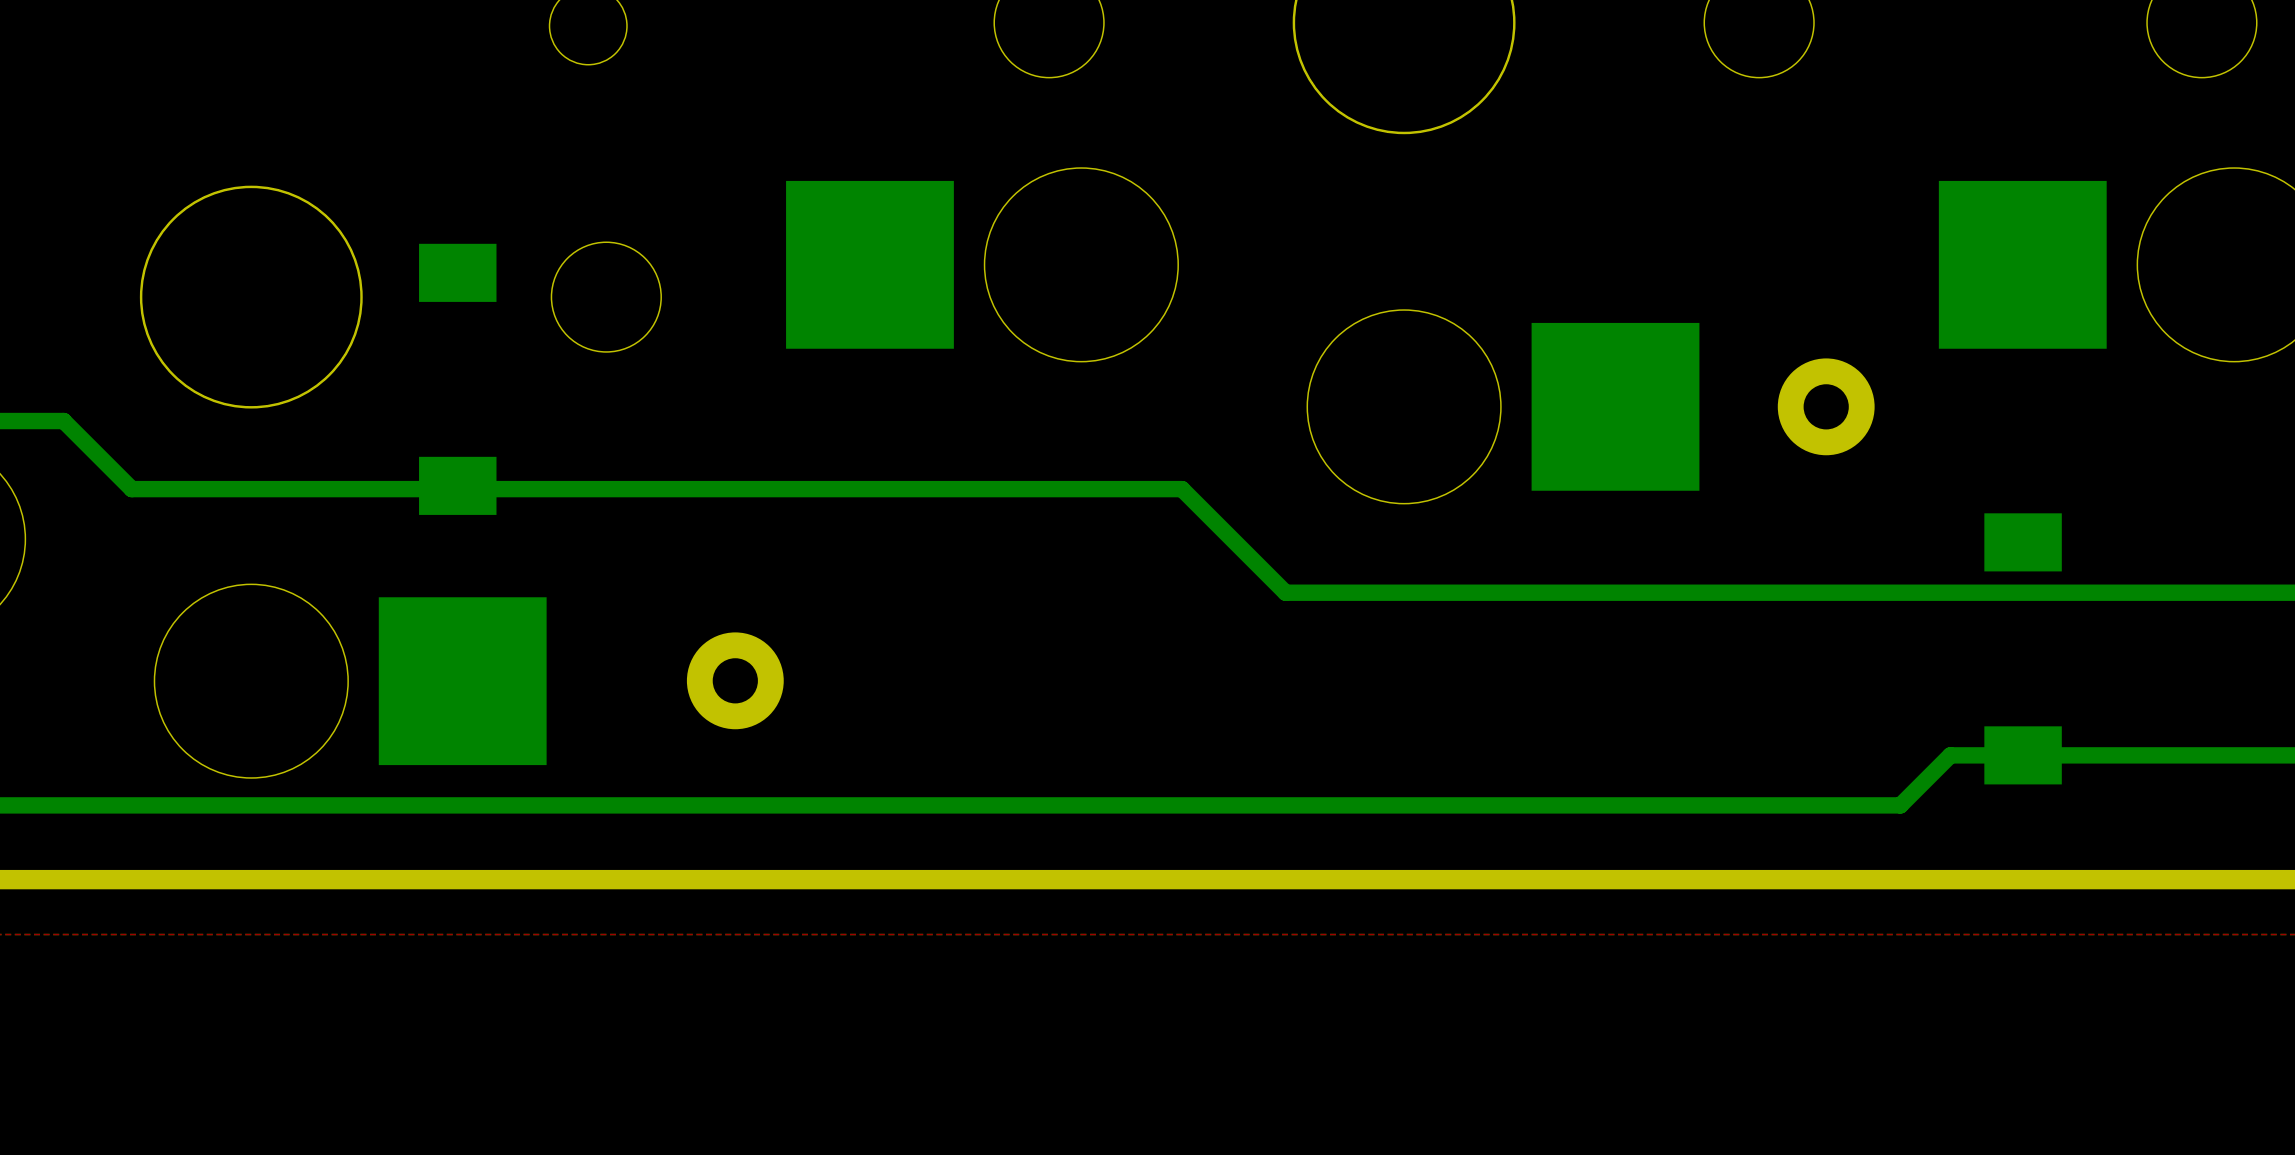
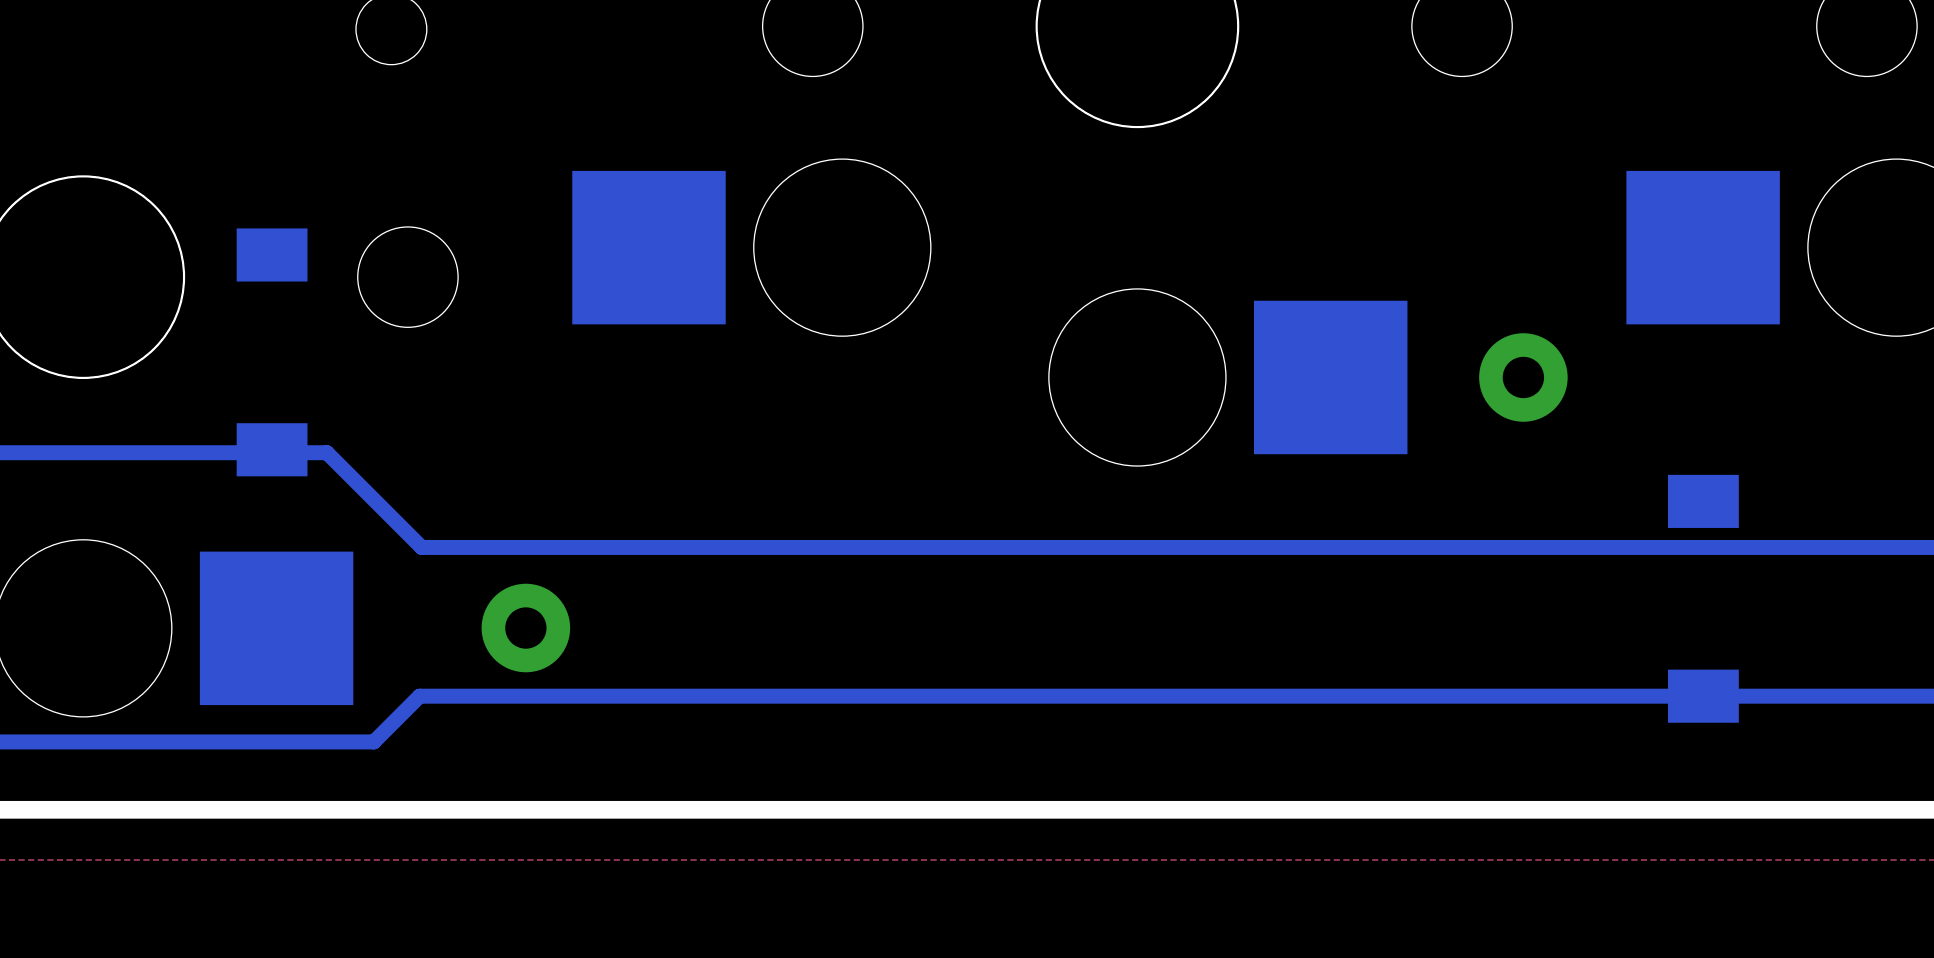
bottom track: (517, 489) (1182, 489) (1285, 592) -> (326, 452) (421, 547) (1029, 547)
bottom track: (1950, 755) (1900, 805) (569, 805) -> (1637, 696) (419, 696) (373, 741)

